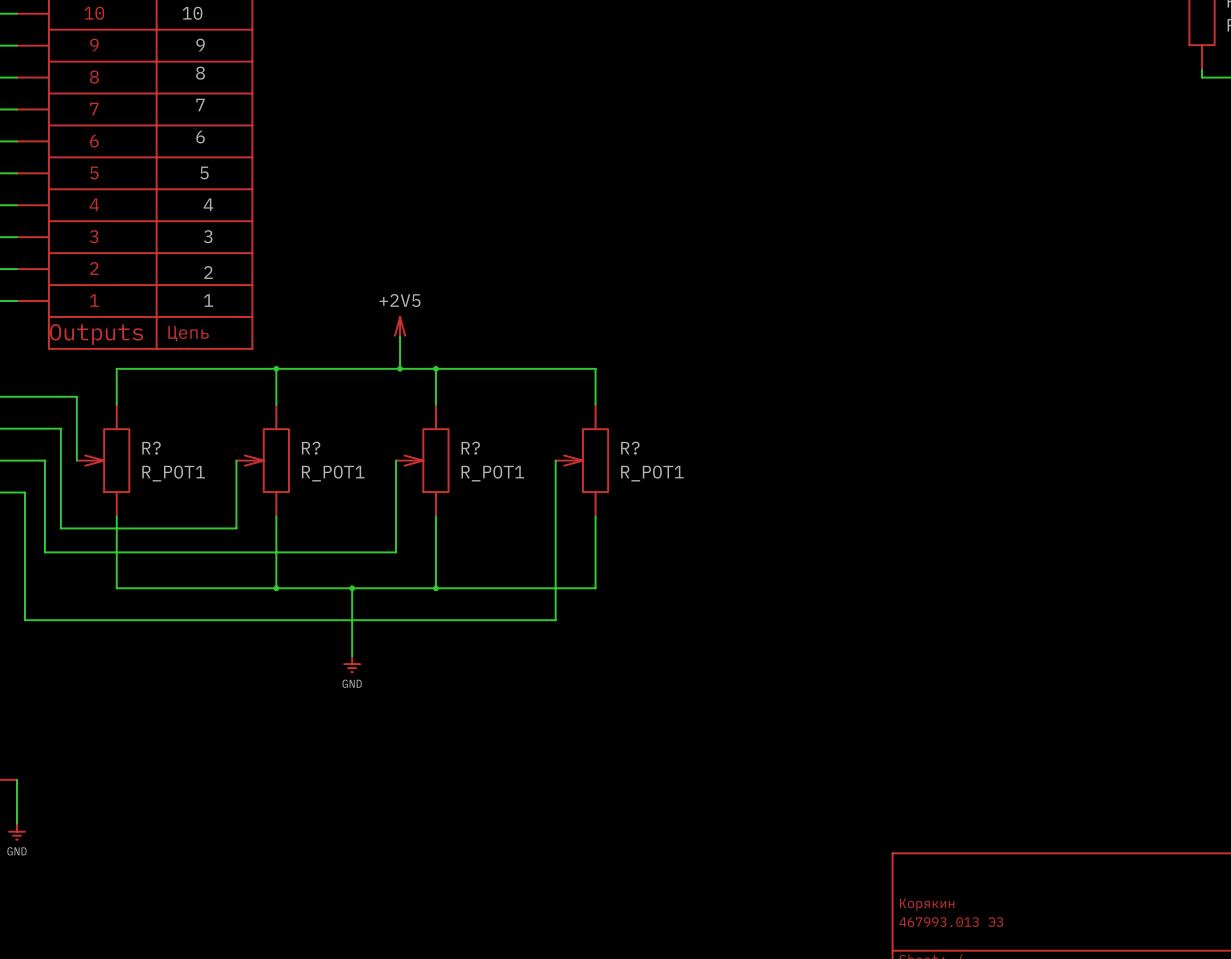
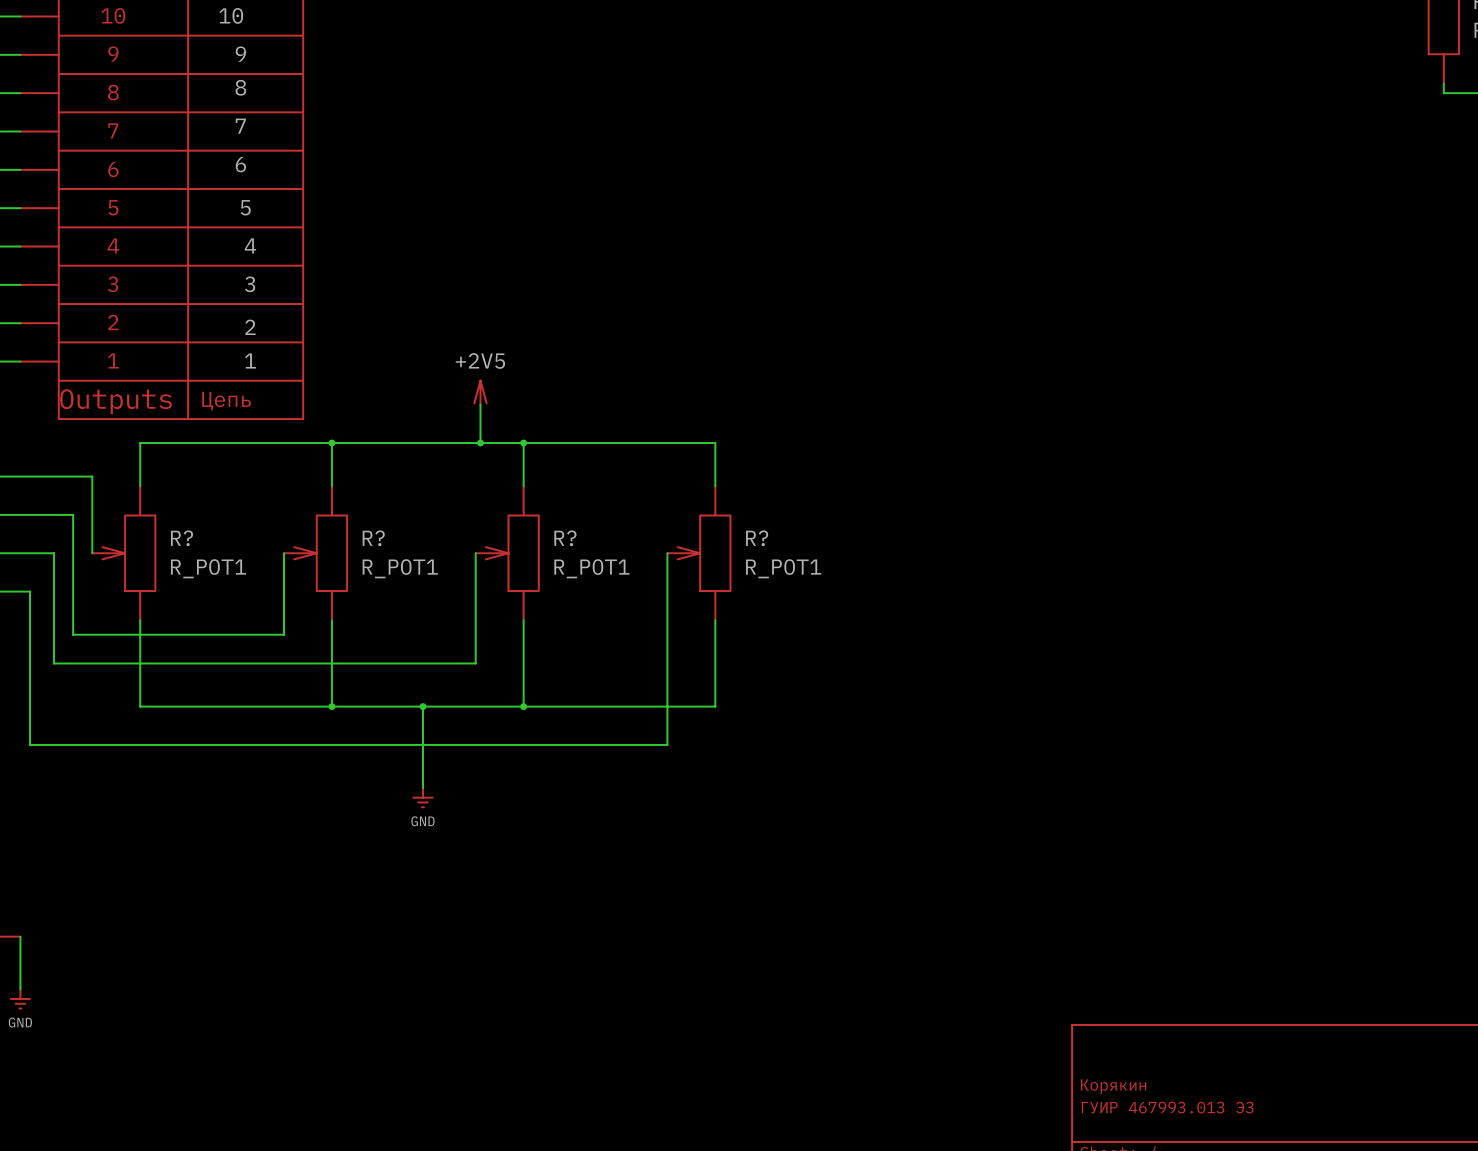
title block: 467993.013 Э3 (951, 922) -> ГУИР 467993.013 Э3 (1167, 1107)

